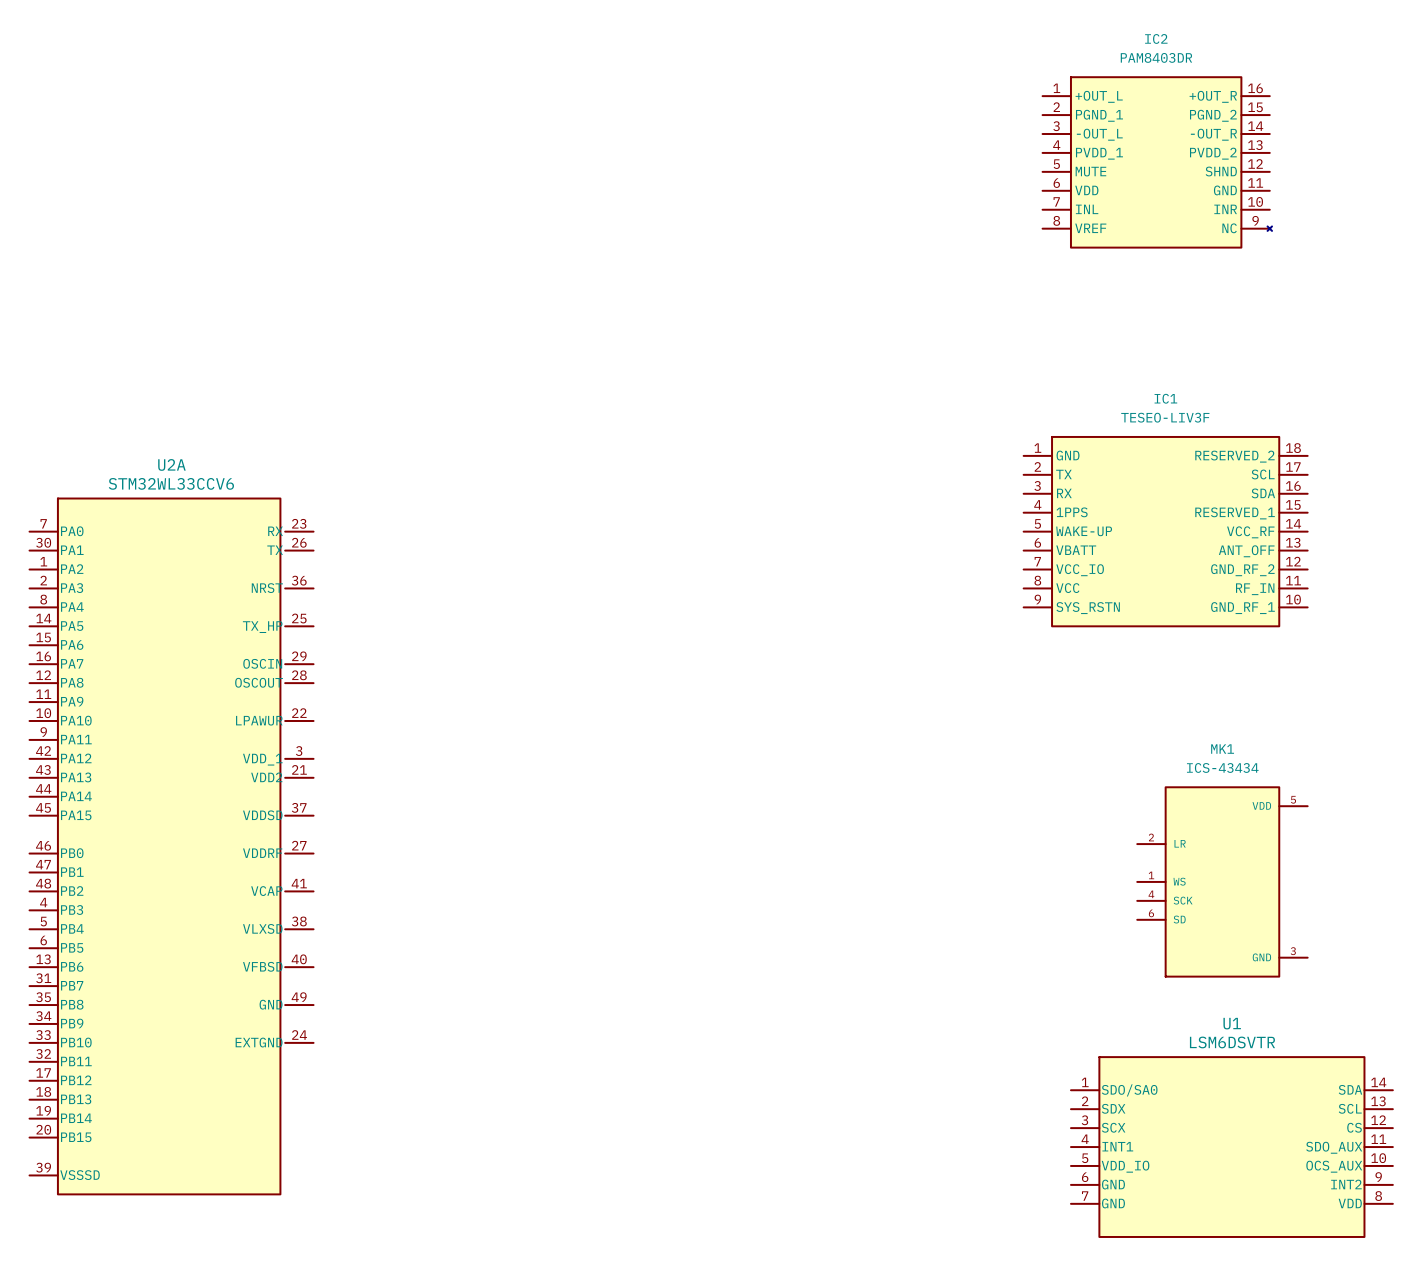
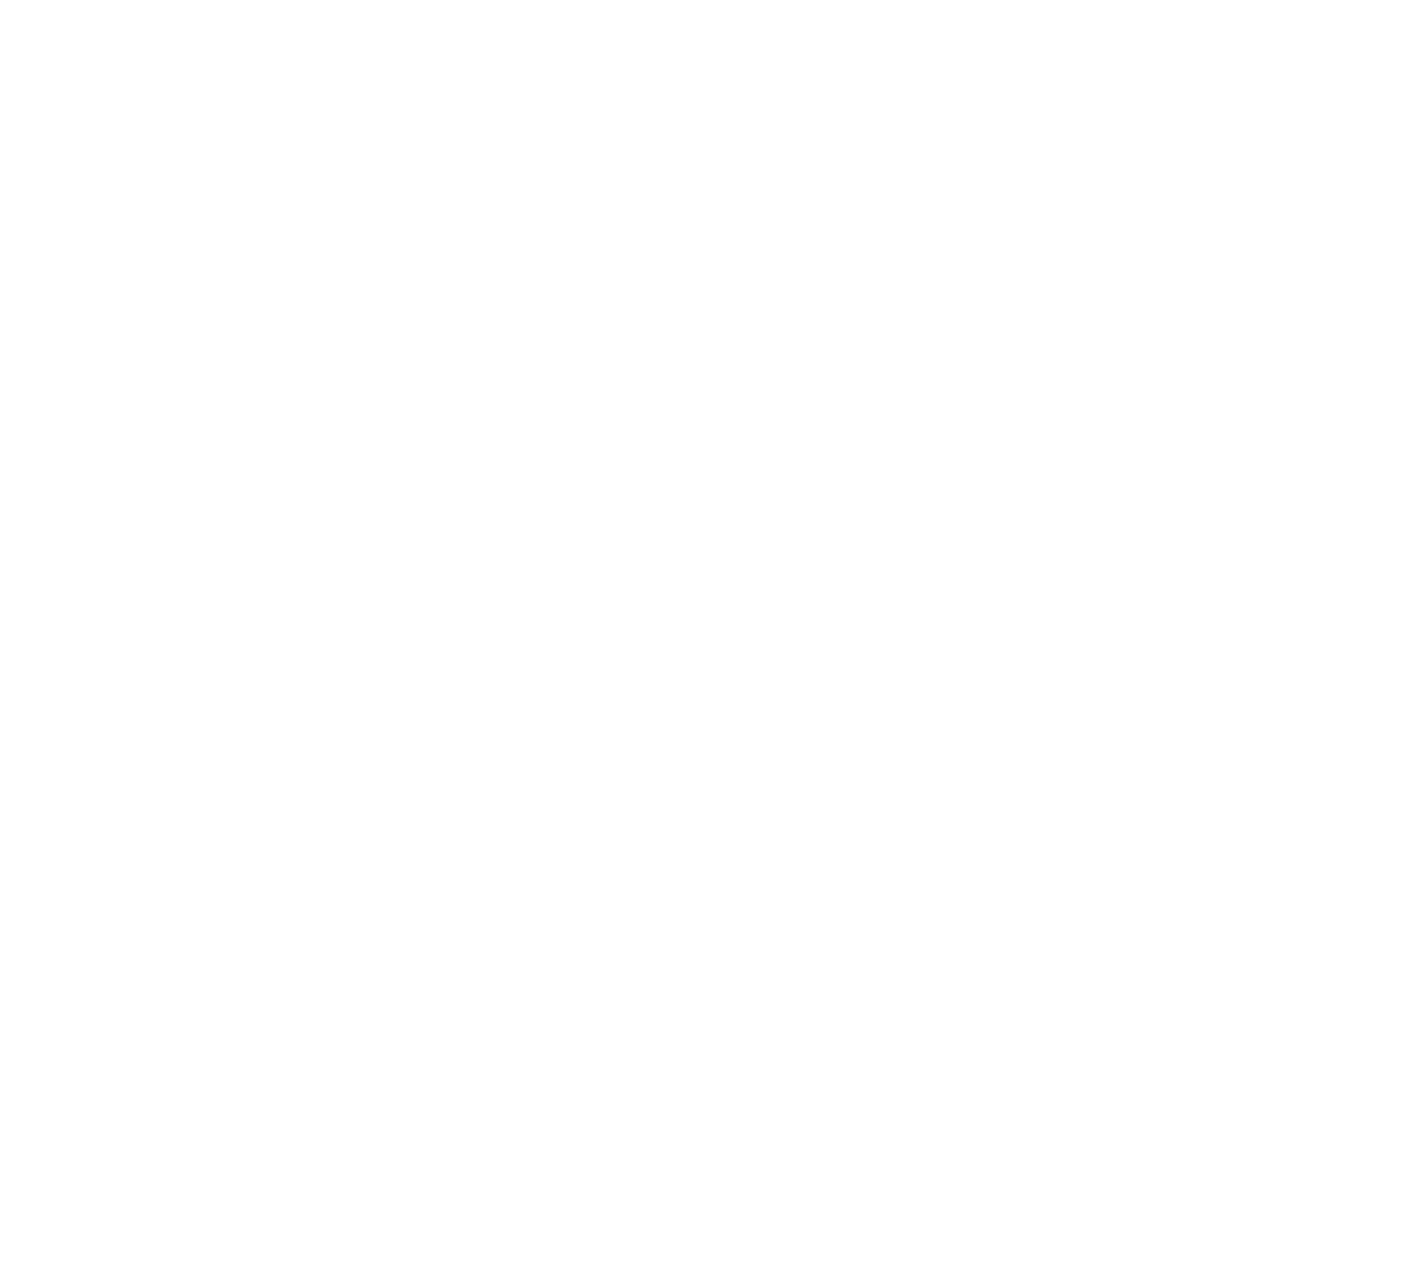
IC2: PAM8403DR (1157, 162) -> none
IC1: TESEO-LIV3F (1165, 531) -> none
U2A: STM32WL33CCV6 (171, 846) -> none
MK1: ICS-43434 (1222, 881) -> none
U1: LSM6DSVTR (1231, 1147) -> none

